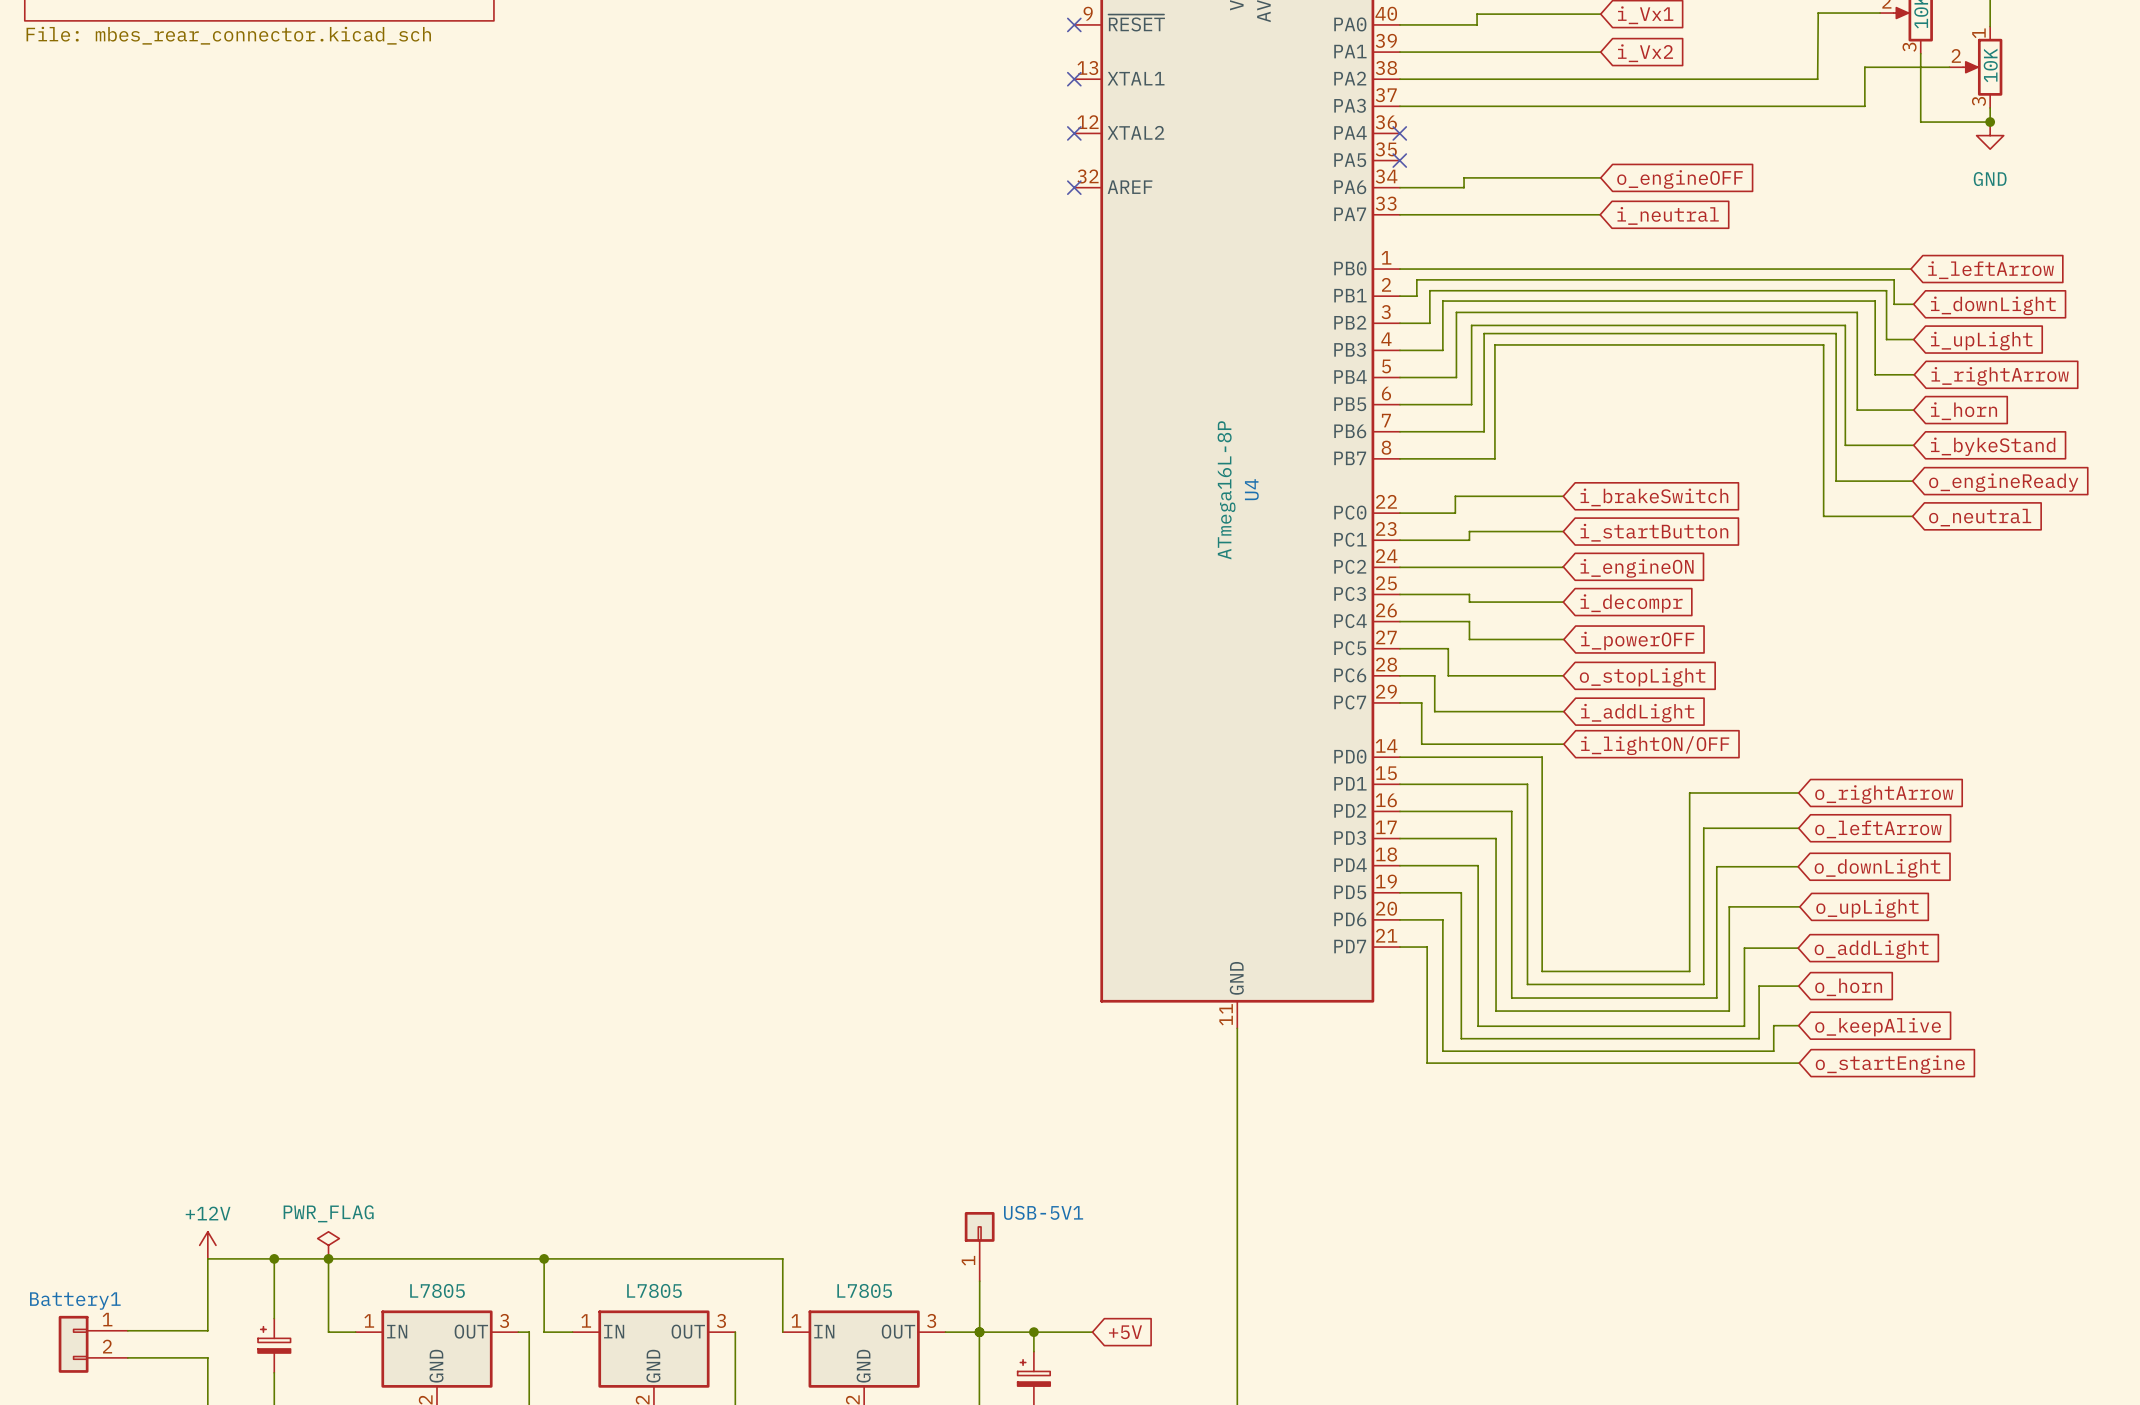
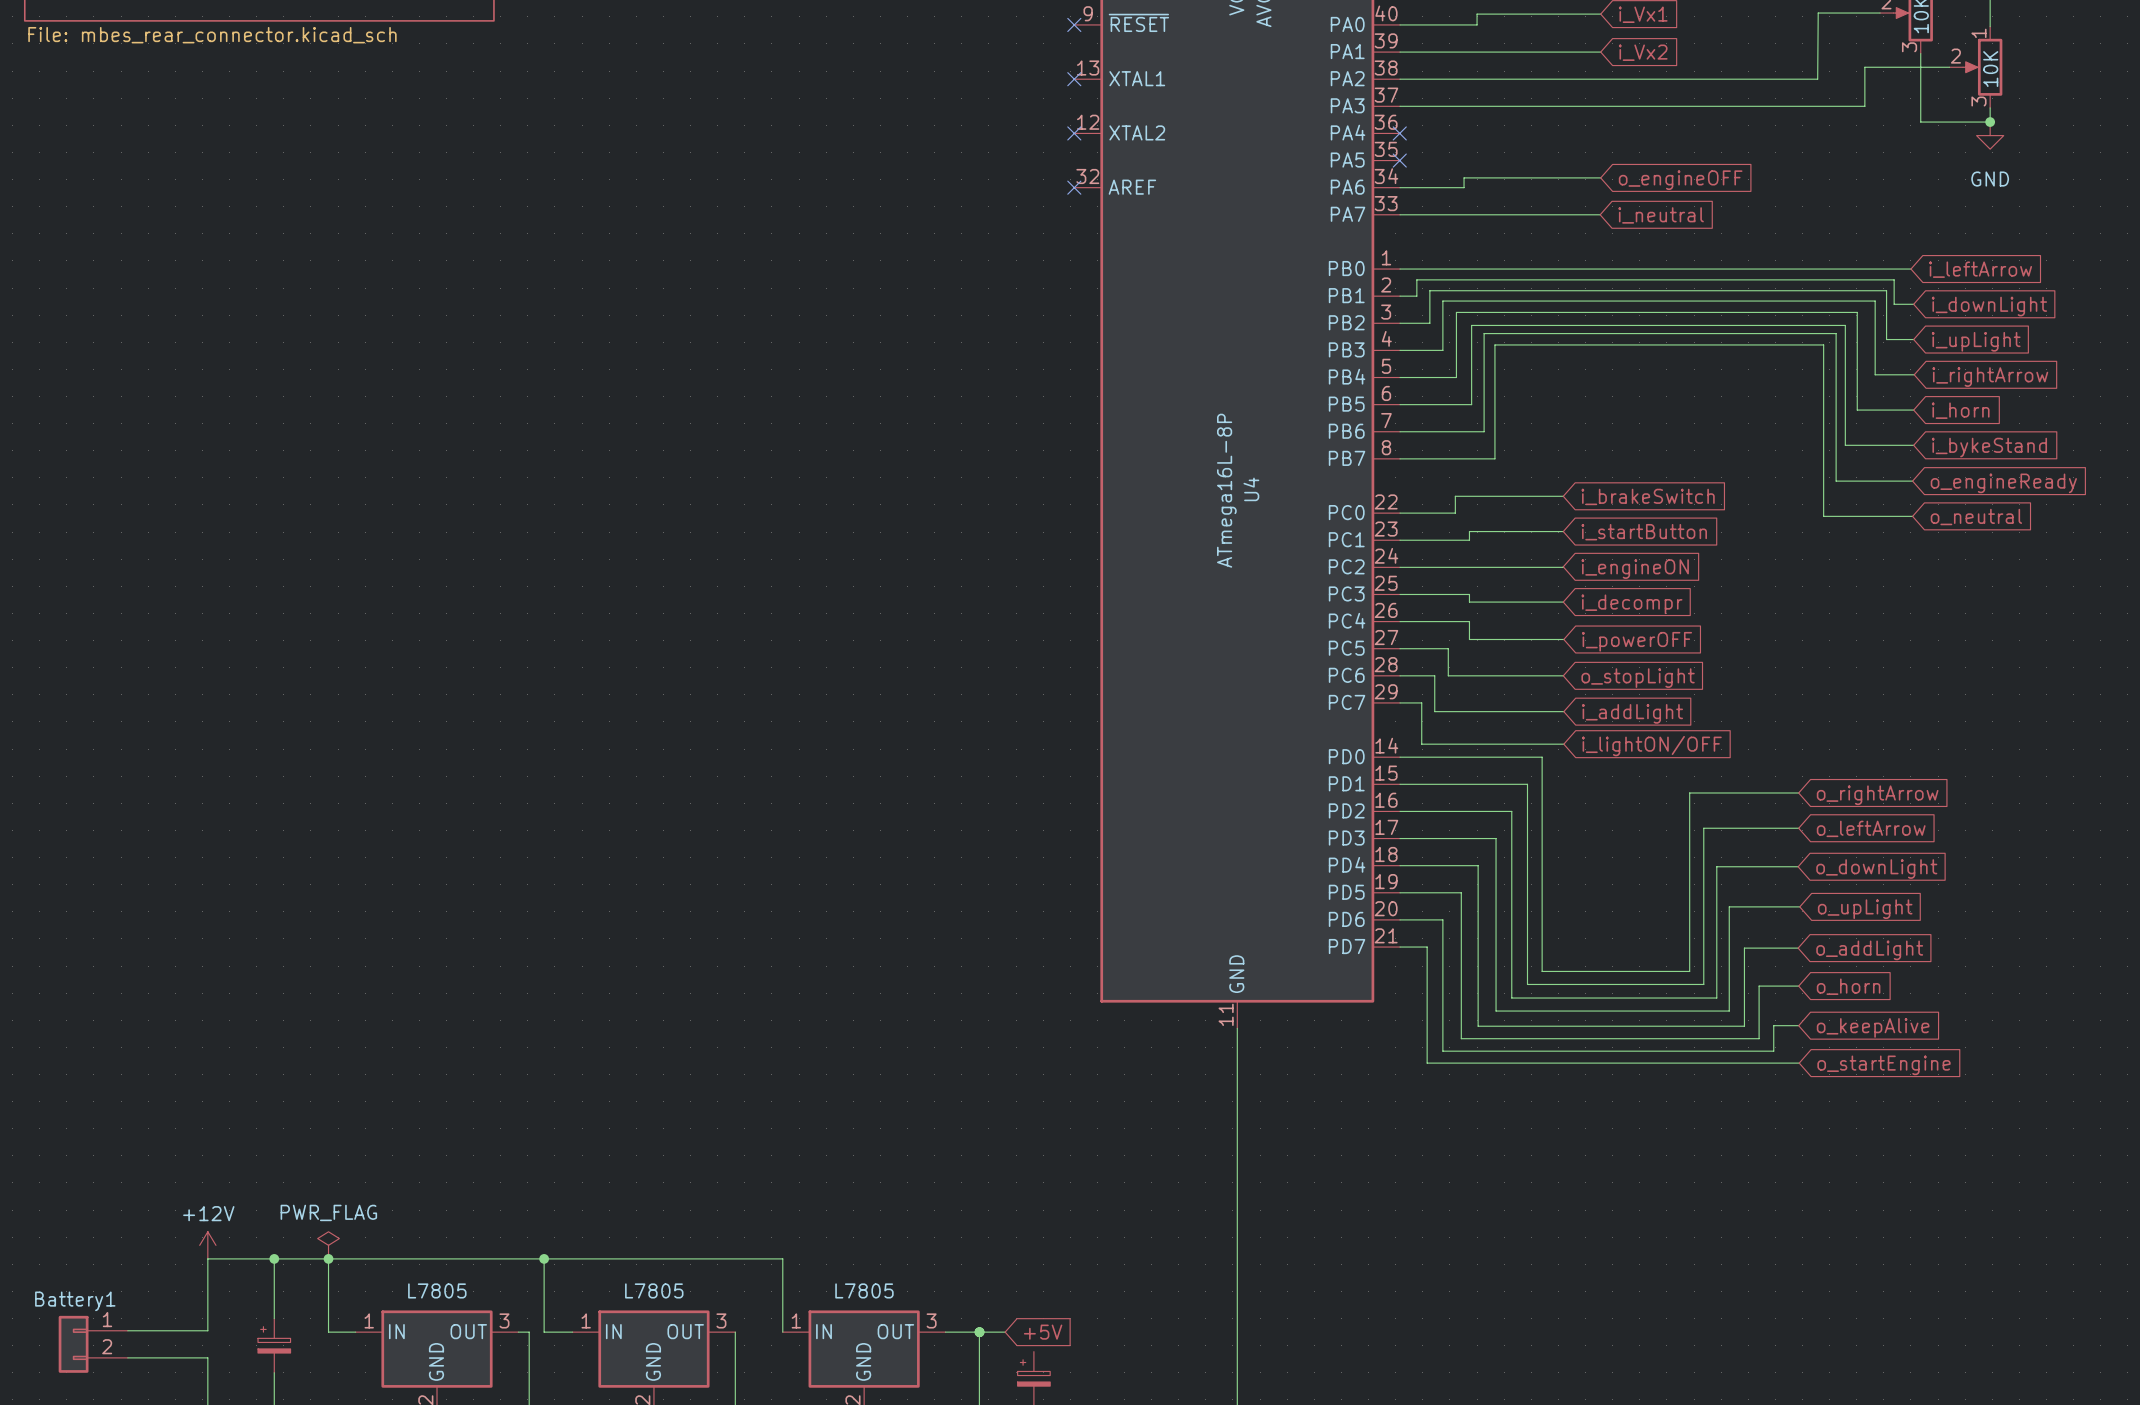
USB-5V1: (979, 1246) -> none
wire: (979, 1281) (979, 1332) -> none
wire: (1005, 1332) (1092, 1332) -> none
wire: (1033, 1332) (1033, 1351) -> none
junction: (1033, 1332) -> none
global label position: +5V (1125, 1332) -> +5V (1043, 1332)

